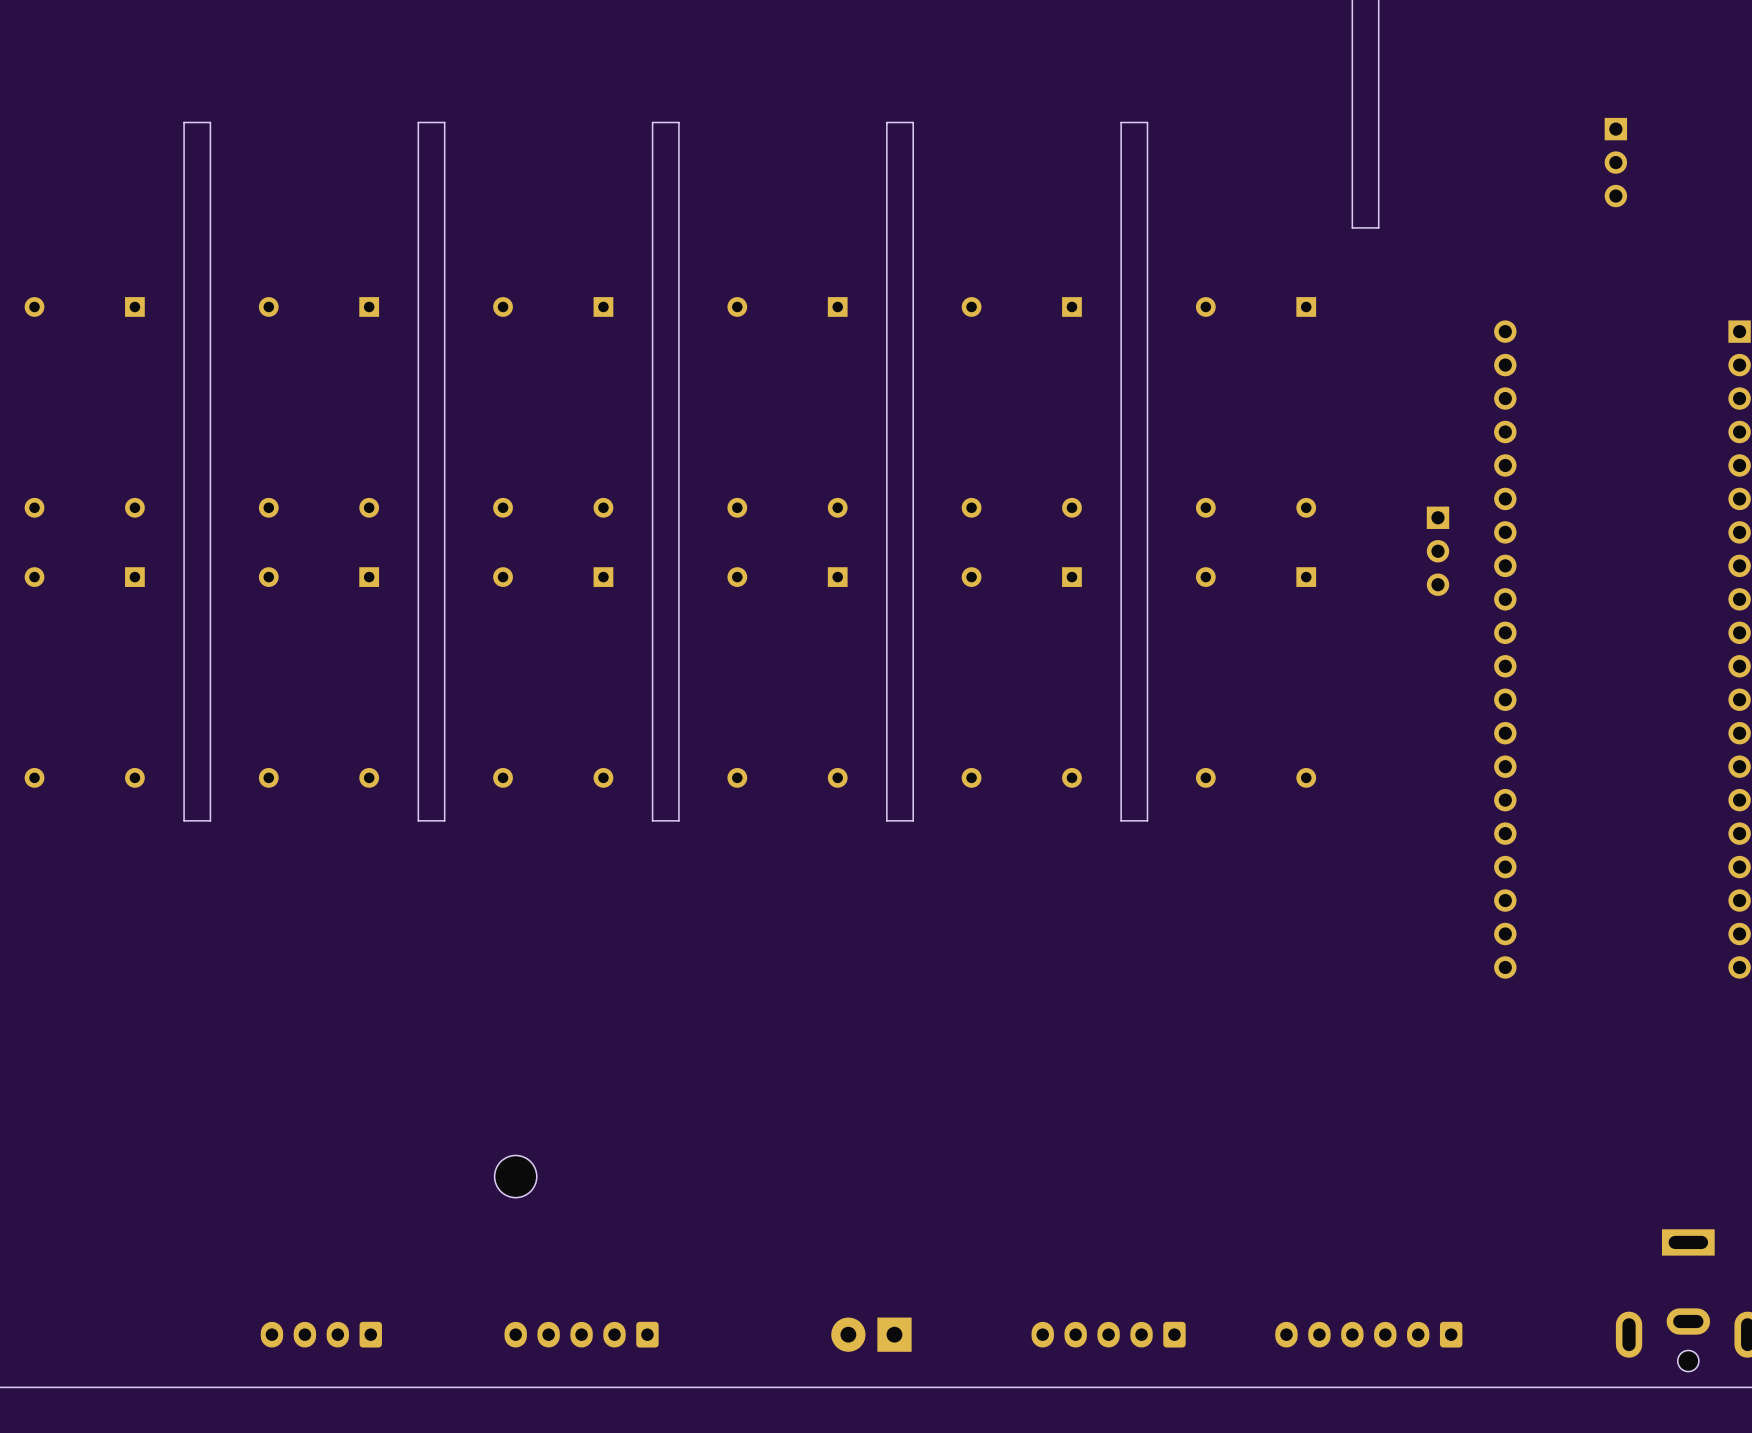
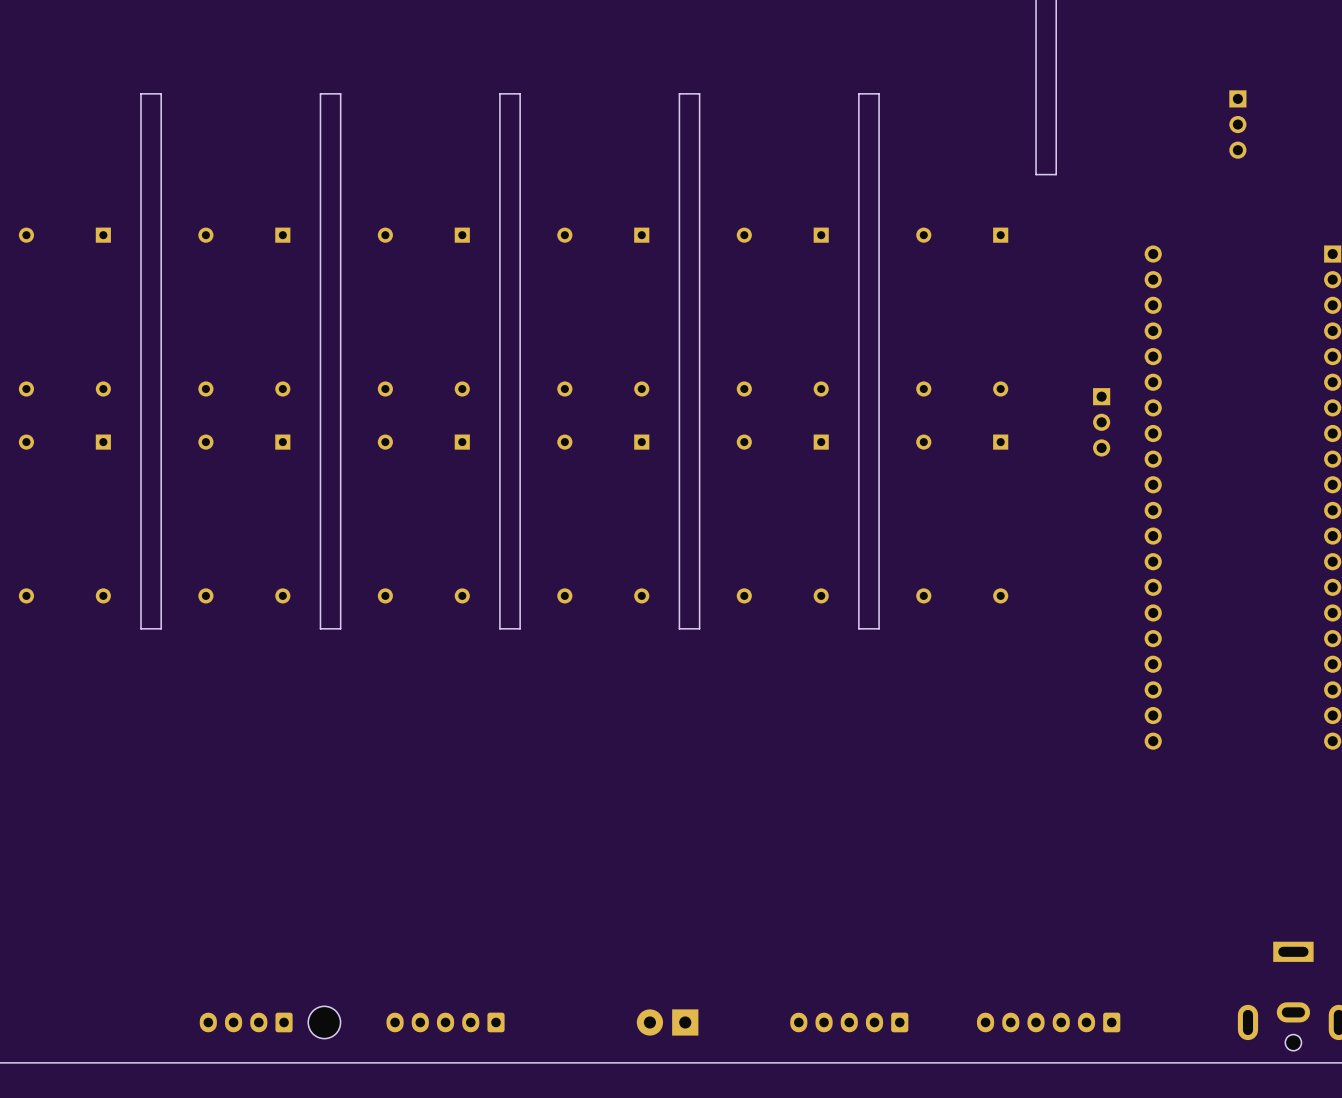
part position: (515, 1176) -> (324, 1022)

